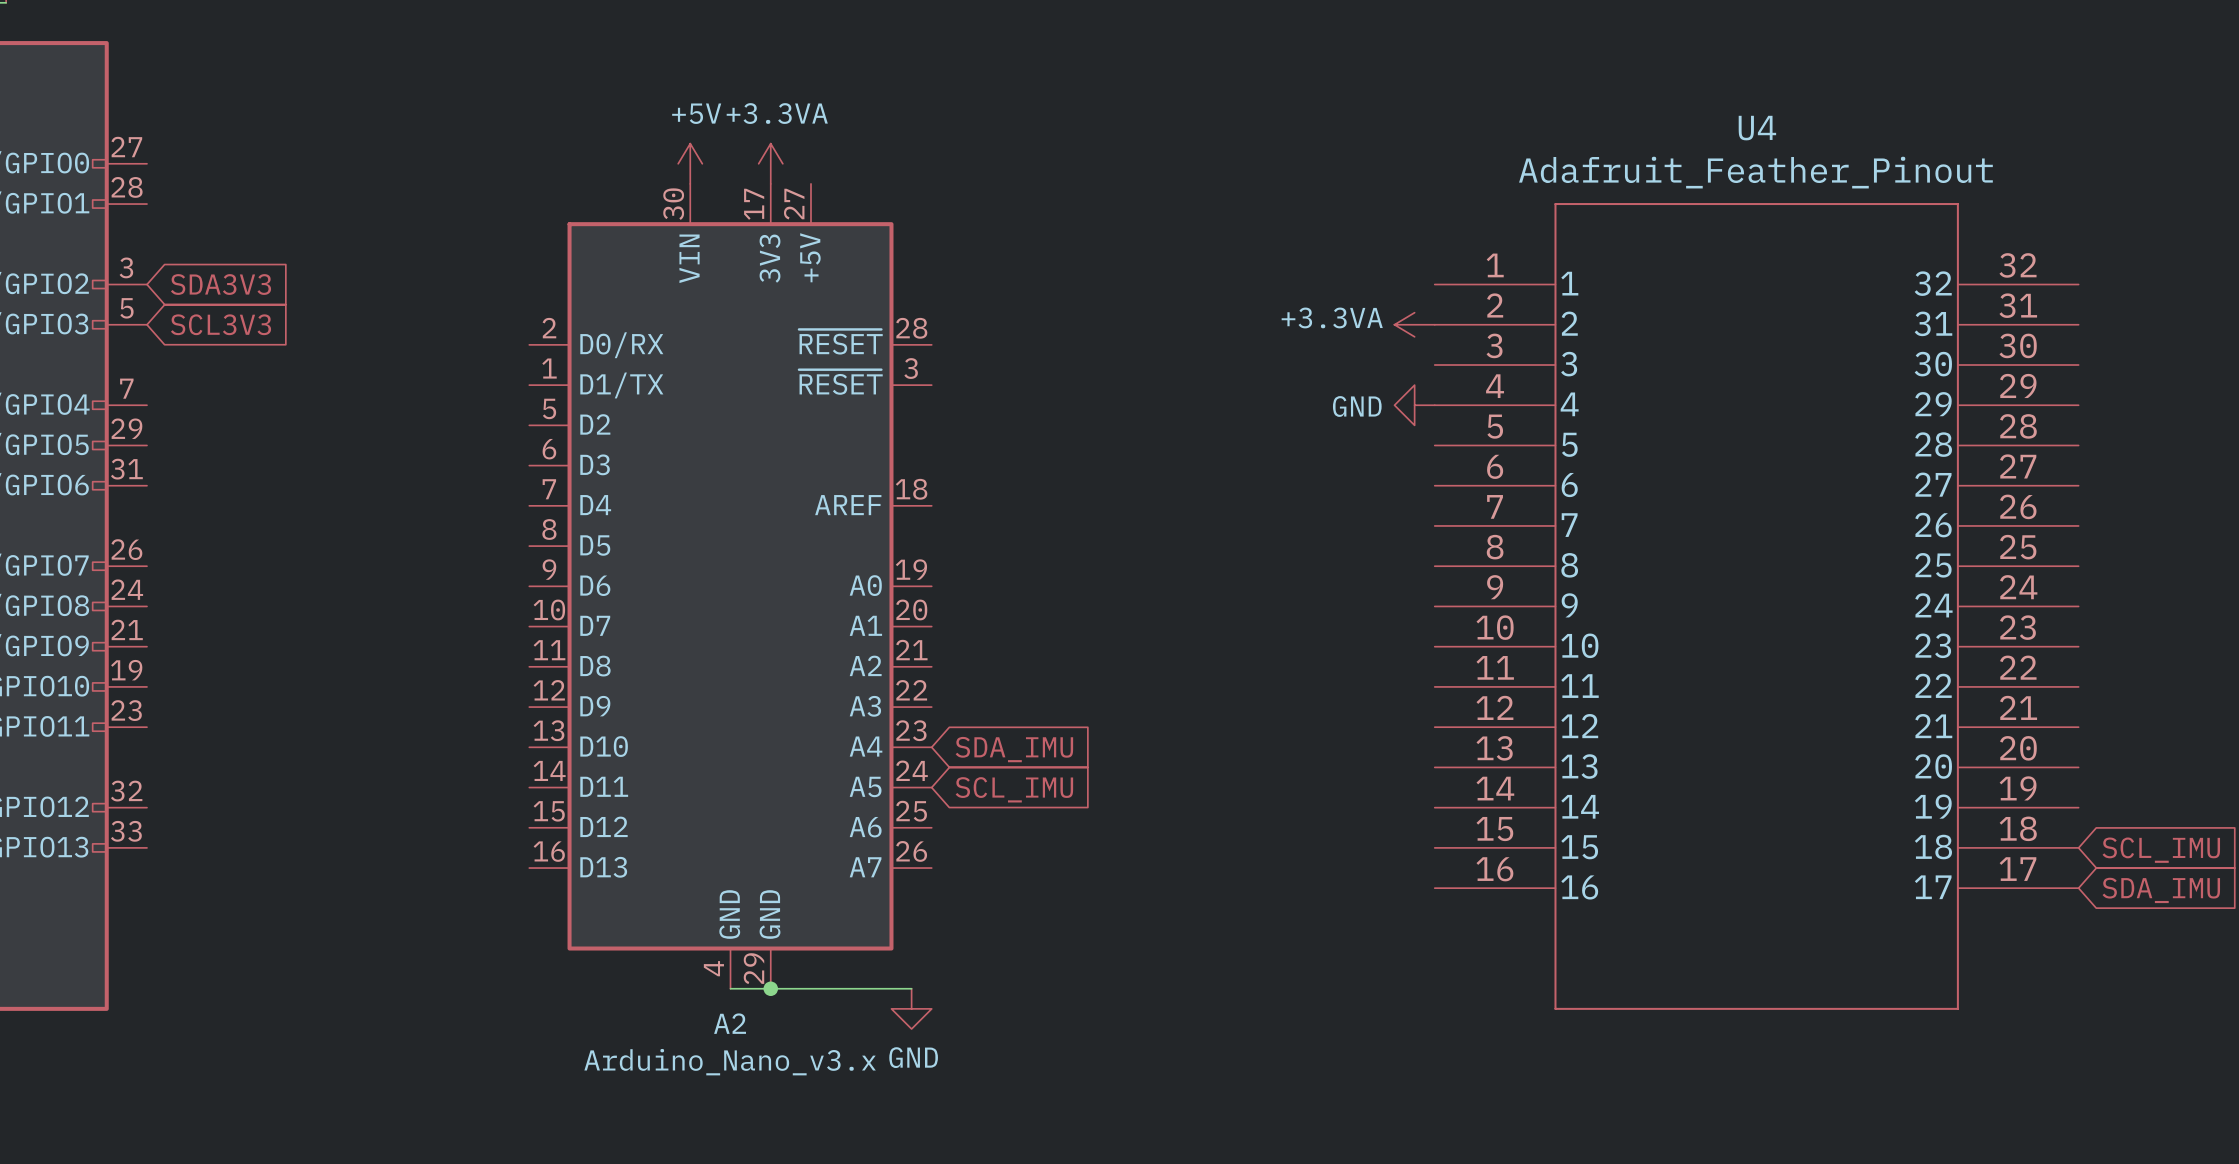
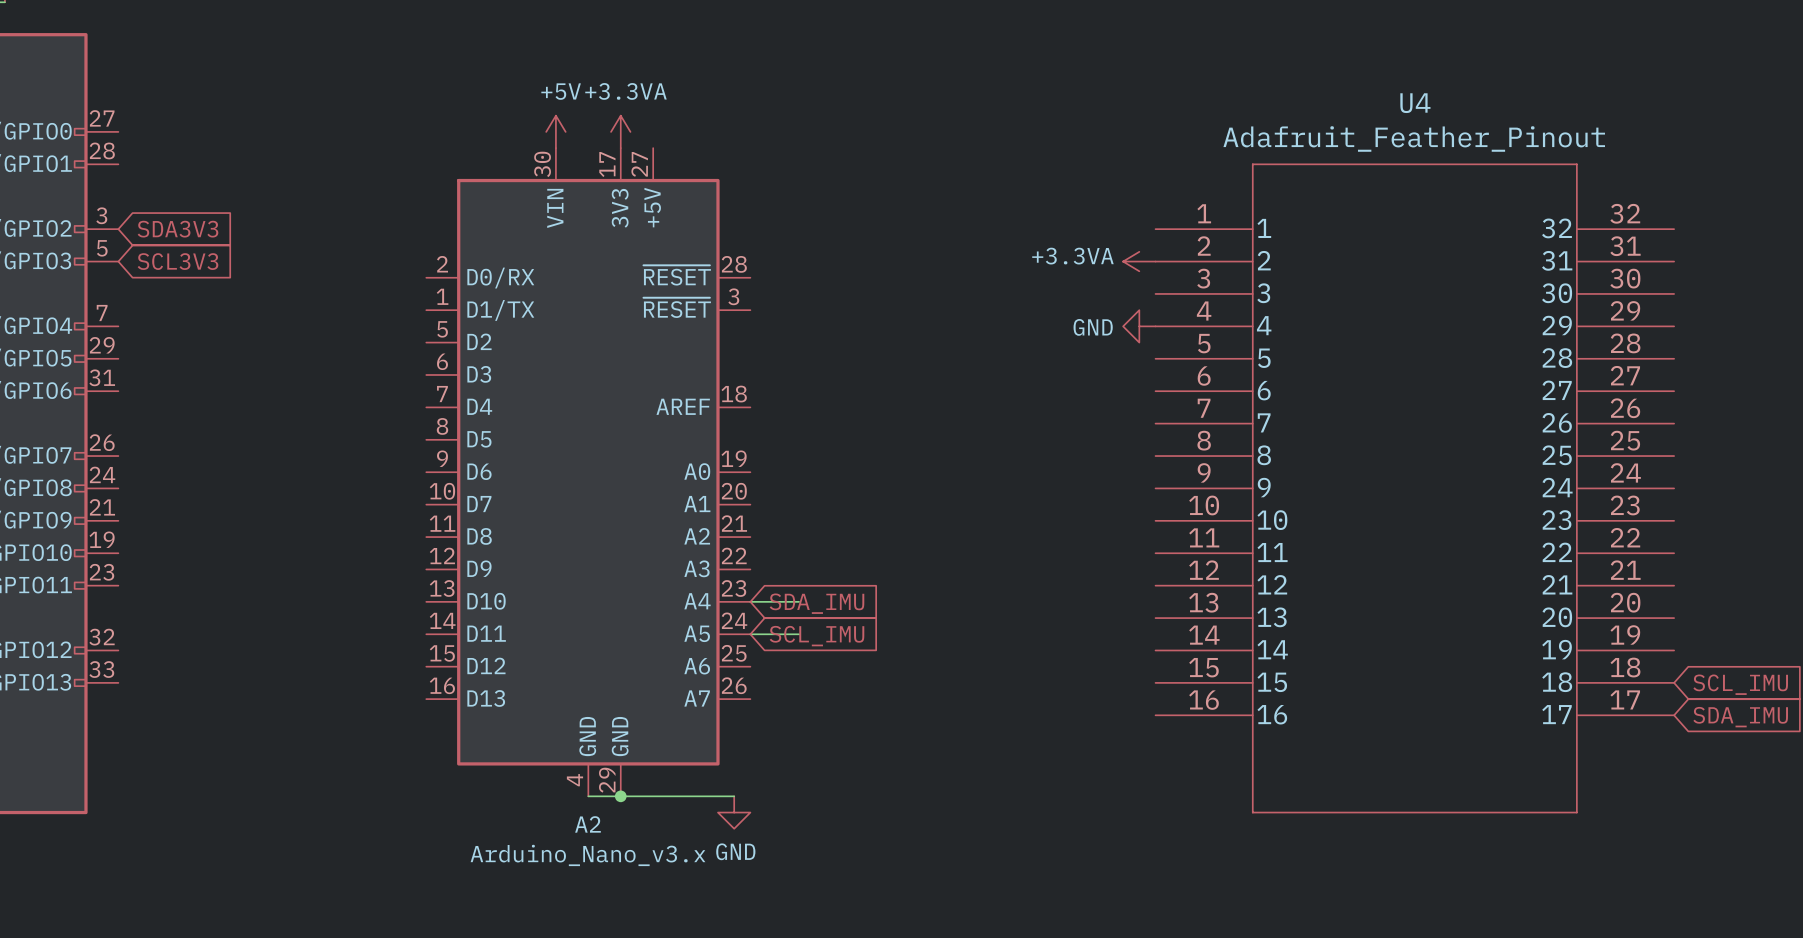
wire: none -> (750, 601) (799, 601)
wire: none -> (750, 634) (799, 634)

